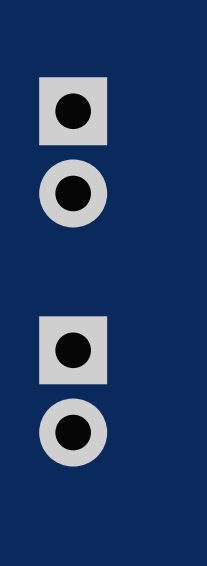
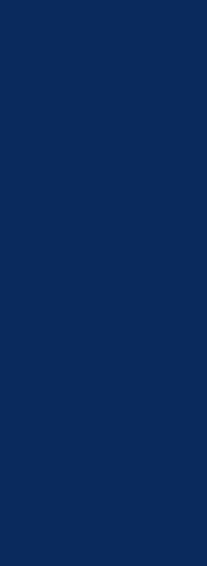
part: (73, 152) -> none
part: (73, 391) -> none

